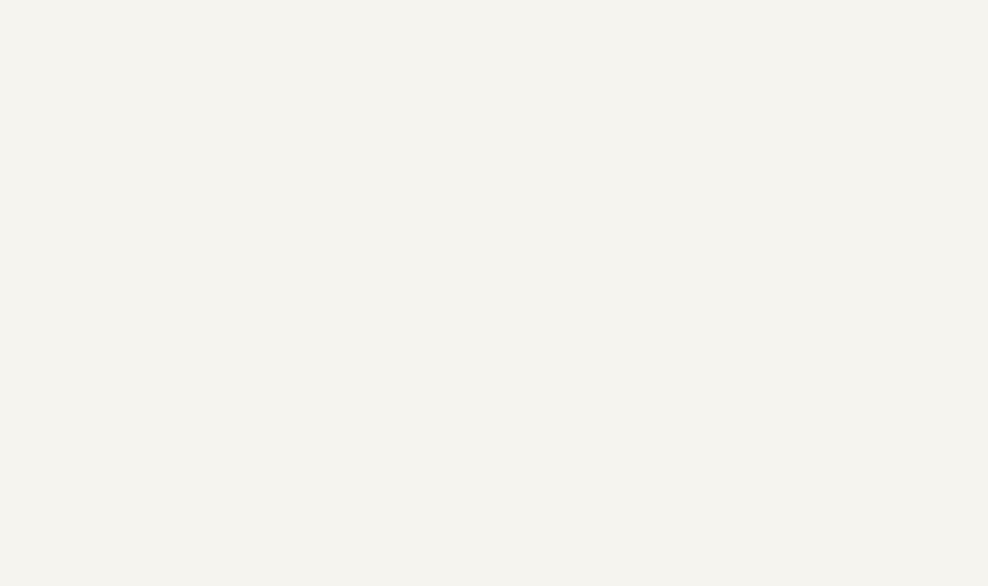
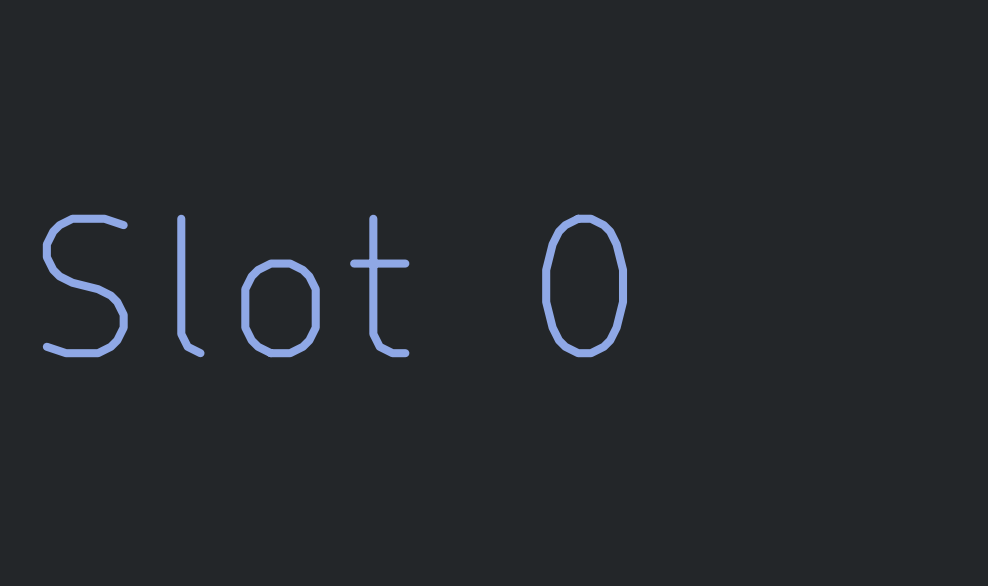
text: none -> Slot 0 (334, 285)

